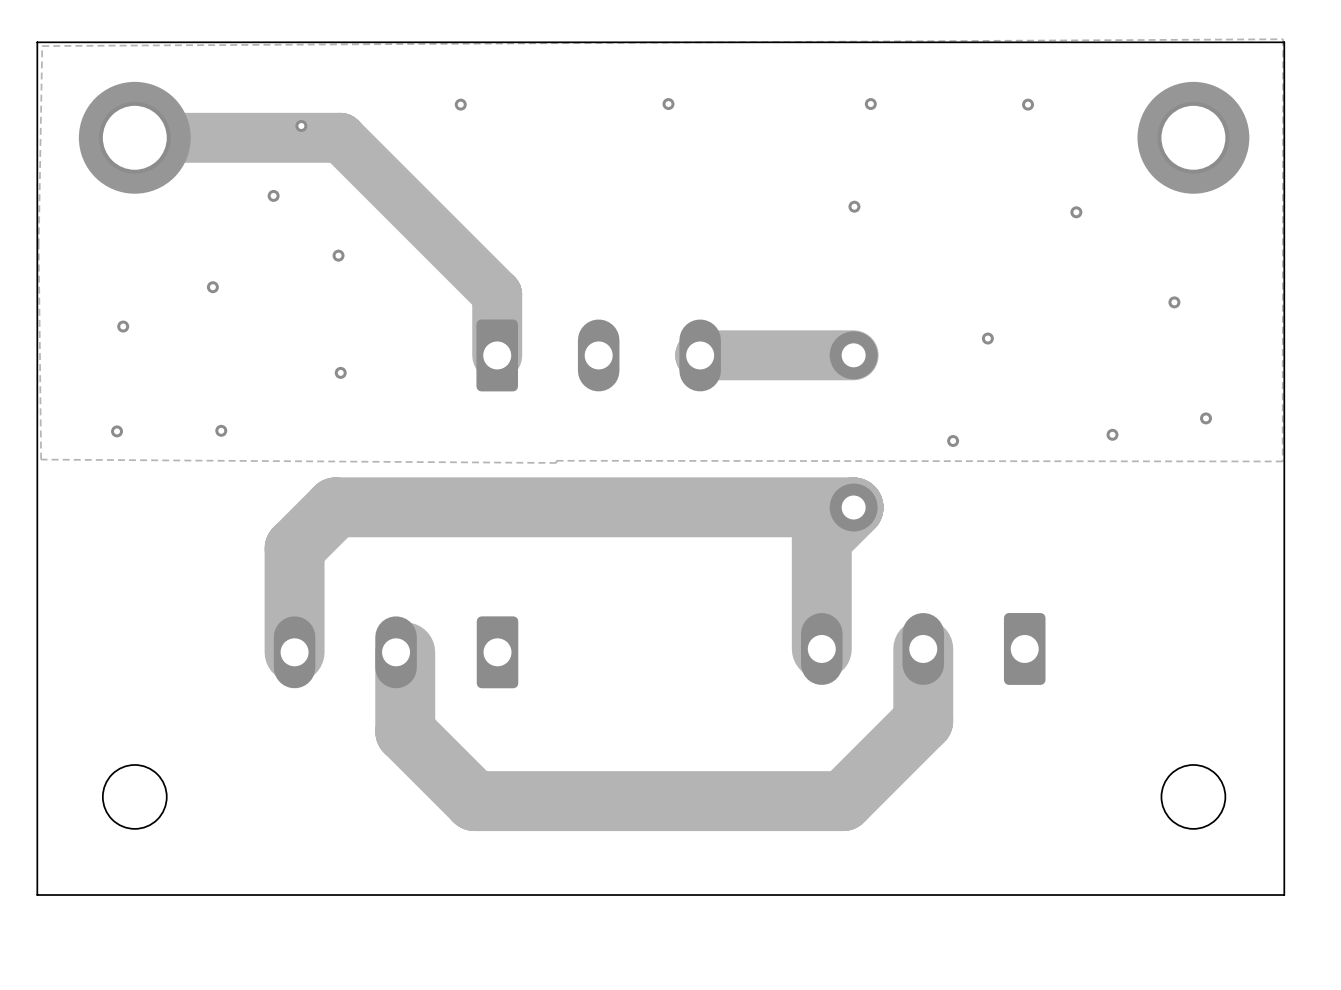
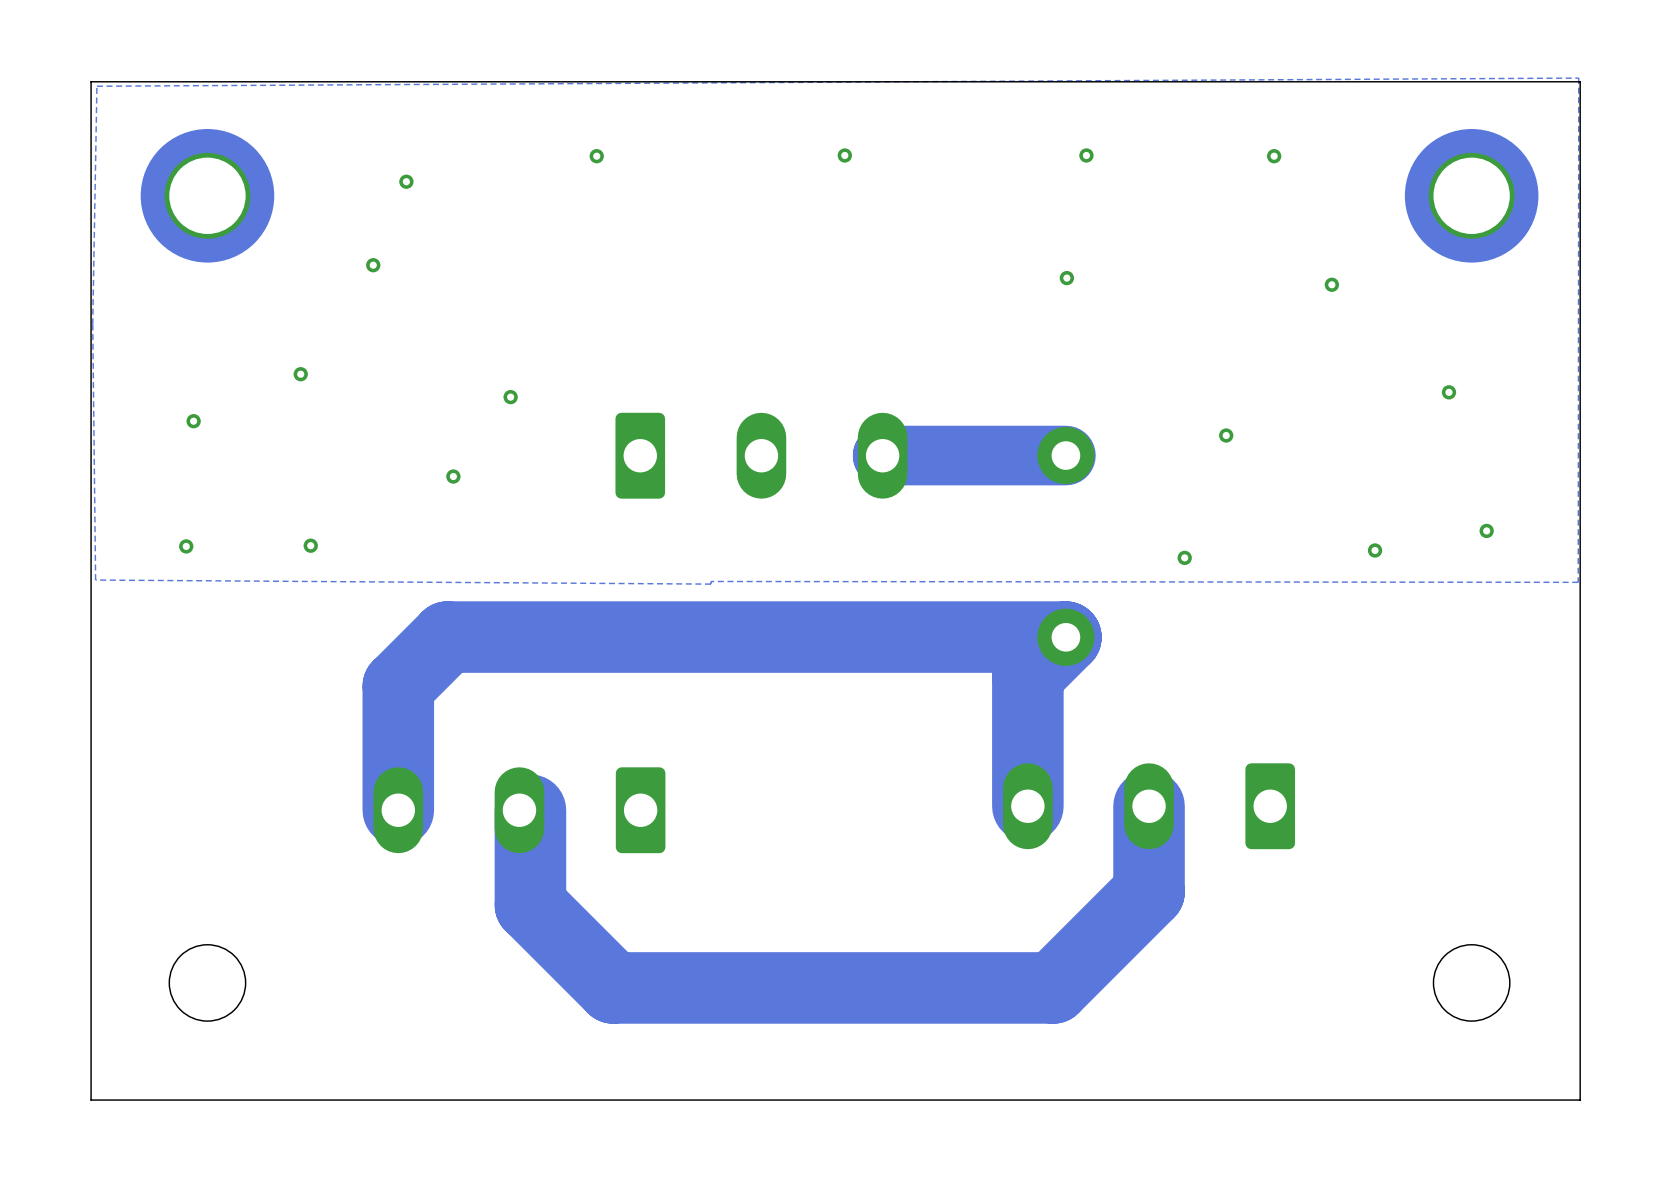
track: (134, 137) (340, 137) (497, 294) (497, 355) -> none
via position: (338, 255) -> (510, 397)

